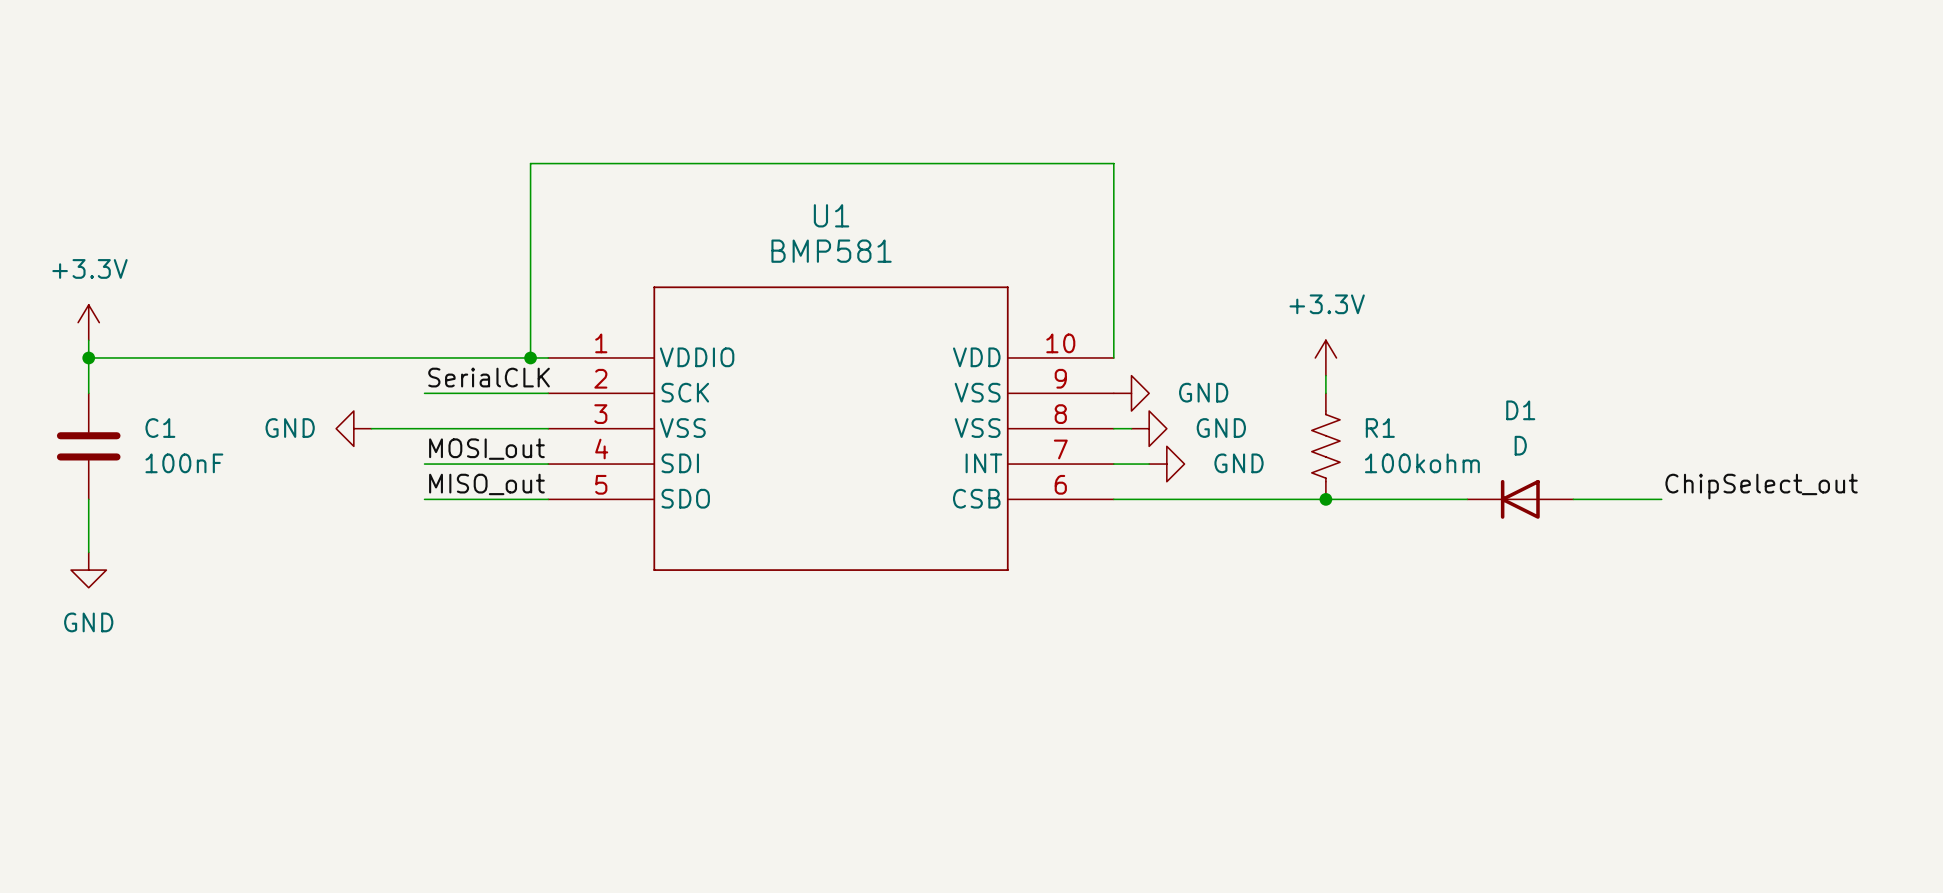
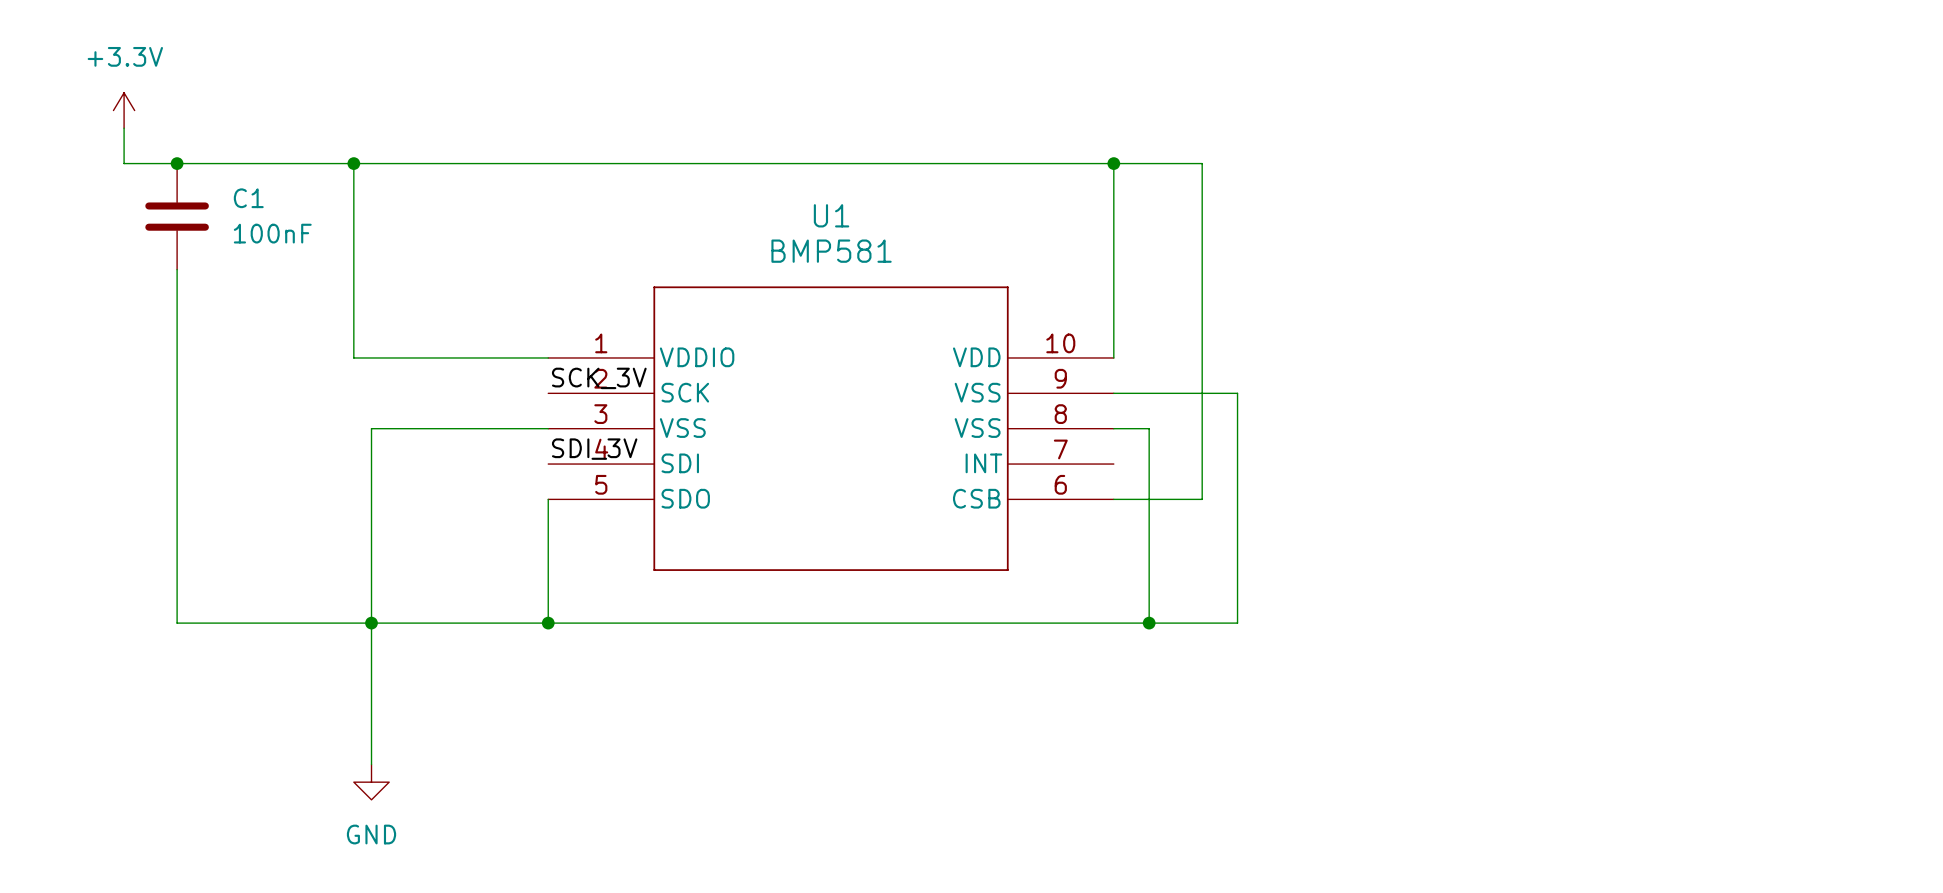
junction: none -> (177, 163)
junction: none -> (353, 163)
wire: (530, 163) (530, 357) -> (530, 163) (124, 163) (124, 128)
junction: none -> (1113, 163)
wire: none -> (177, 269) (177, 623) (1237, 623) (1237, 393) (1113, 393)
power symbol position: +3.3V (88, 322) -> +3.3V (124, 110)
wire: (88, 340) (88, 393) -> none
wire: (88, 357) (353, 357) -> (353, 163) (353, 357)
junction: (88, 357) -> none
junction: (530, 357) -> none
power symbol: +3.3V (1325, 357) -> none
wire: (1325, 375) (1325, 393) -> none
label: SerialCLK (489, 377) -> none
label: none -> SCK_3V (599, 378)
wire: (424, 393) (548, 393) -> none
power symbol: GND (1131, 393) -> none
power symbol: GND (353, 428) -> none
wire: none -> (371, 428) (371, 764)
wire: none -> (1131, 428) (1149, 428) (1149, 623)
power symbol: GND (1149, 428) -> none
C1 position: (88, 446) -> (177, 216)
R1: 100kohm (1325, 446) -> none
label: MOSI_out (486, 449) -> none
label: none -> SDI_3V (594, 449)
wire: (424, 464) (548, 464) -> none
wire: (1113, 464) (1149, 464) -> none
power symbol: GND (1166, 464) -> none
label: MISO_out (486, 484) -> none
label: ChipSelect_out (1761, 486) -> none
wire: (88, 499) (88, 552) -> none
wire: (424, 499) (548, 499) -> (548, 623) (548, 499)
wire: (1202, 499) (1467, 499) -> (1202, 499) (1202, 163) (1113, 163)
junction: (1325, 499) -> none
D1: D (1520, 499) -> none
wire: (1573, 499) (1661, 499) -> none
power symbol: GND (88, 570) -> none
junction: none -> (371, 623)
junction: none -> (548, 623)
junction: none -> (1149, 623)
power symbol: none -> GND (371, 782)

